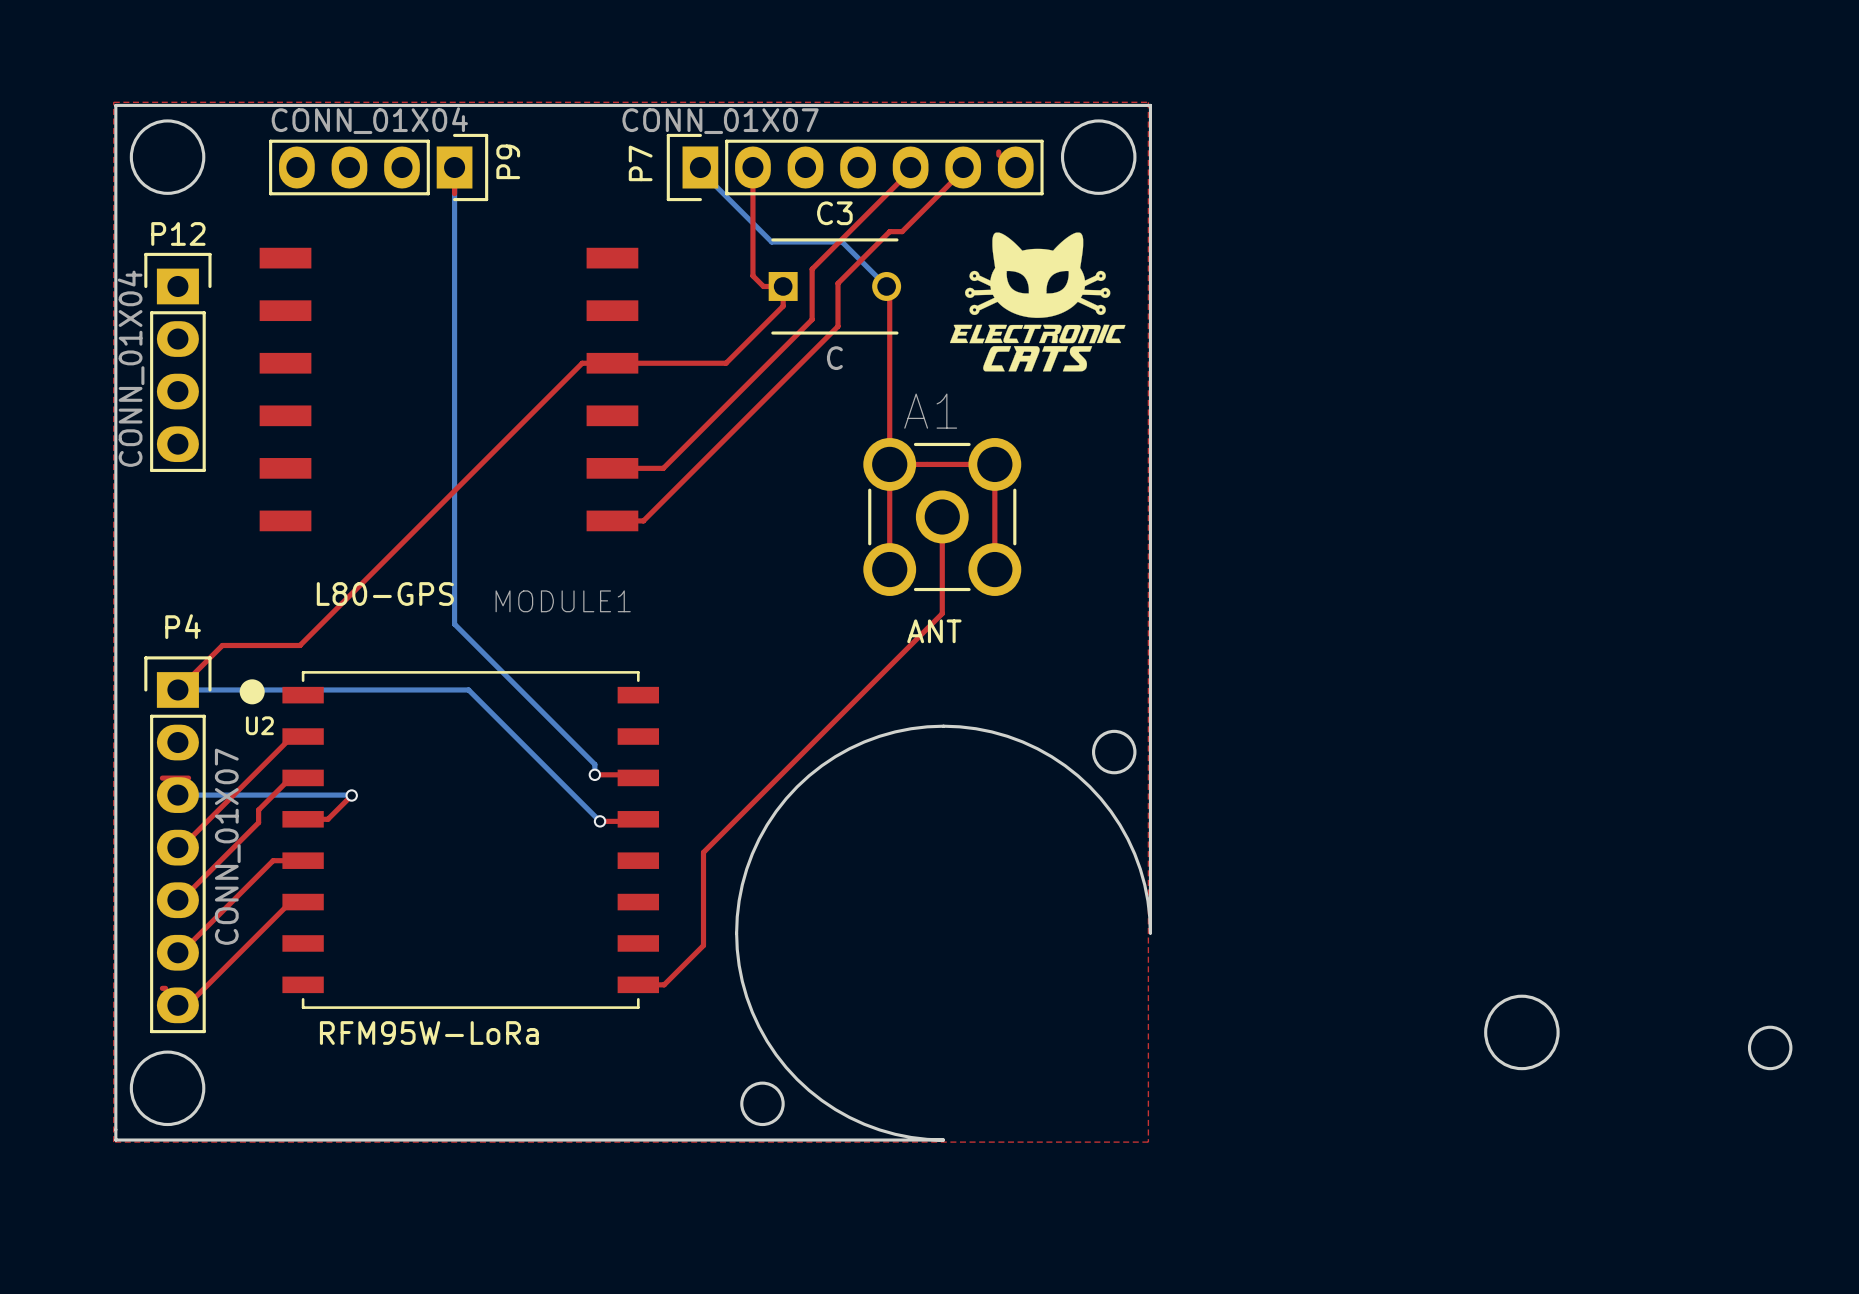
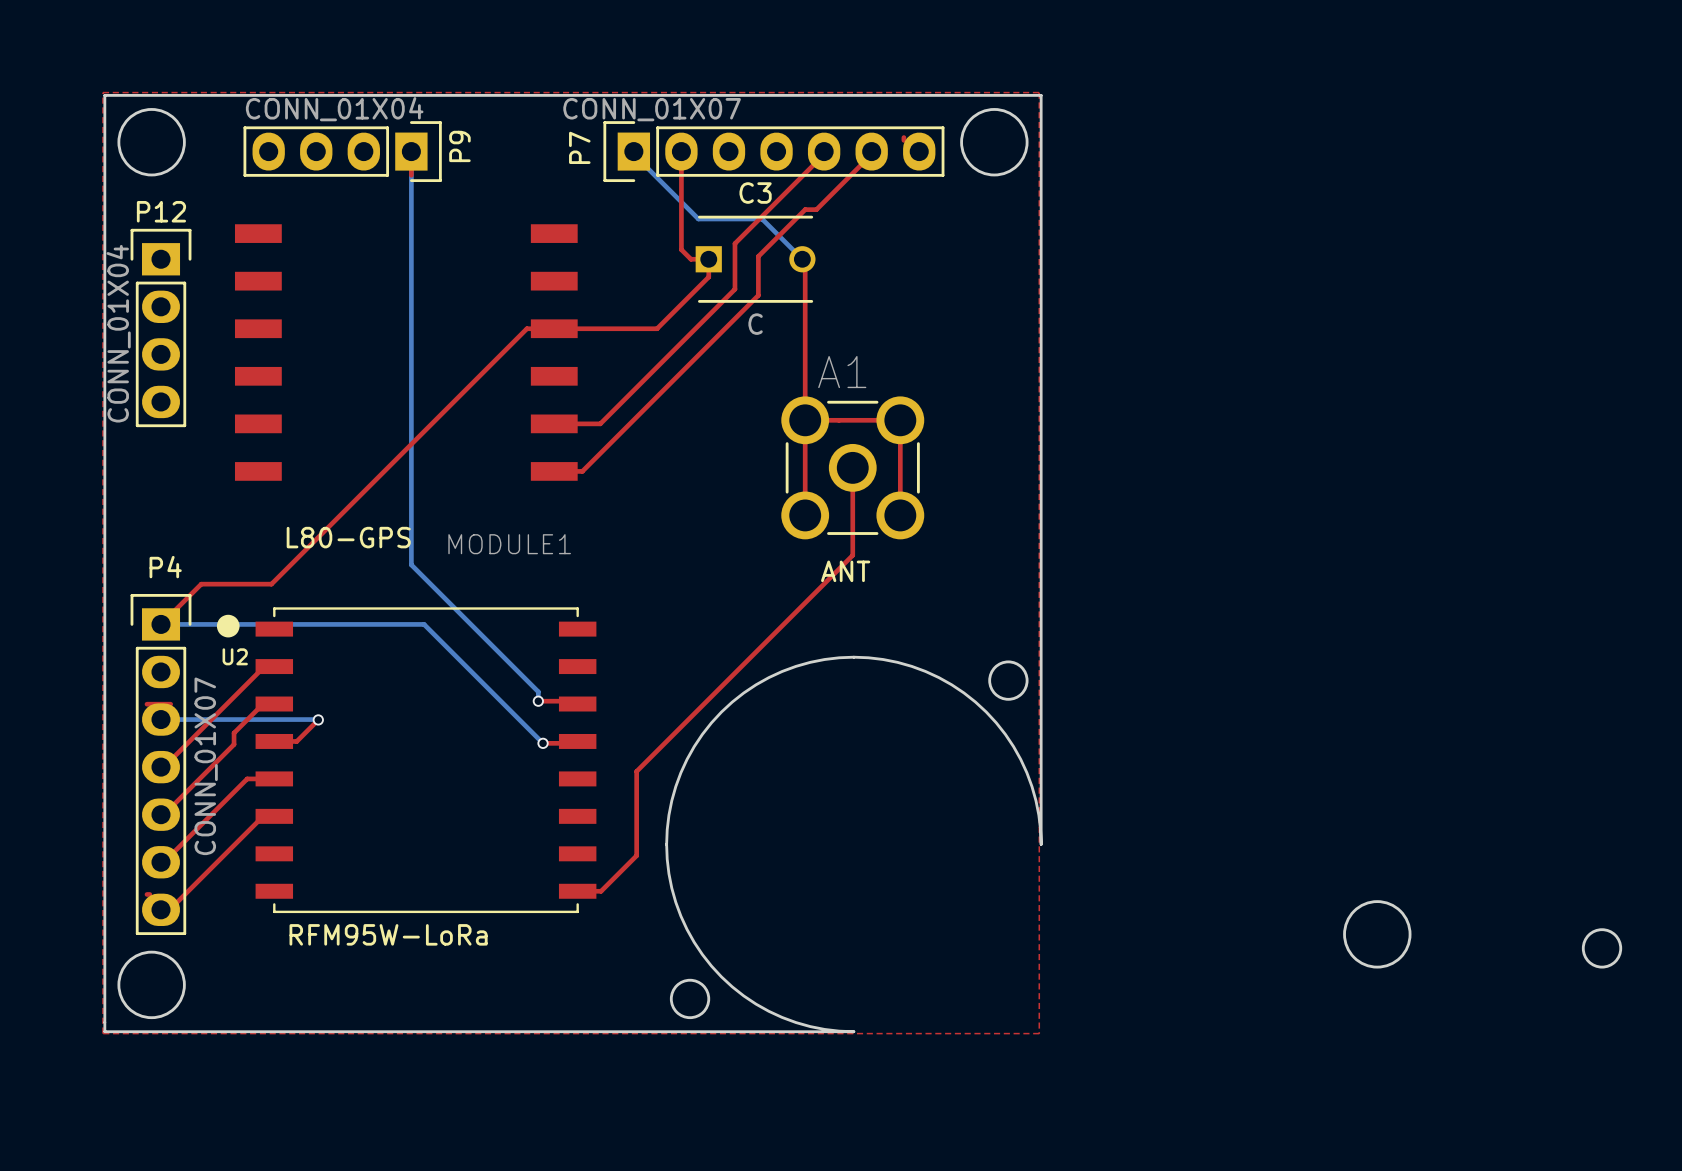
drawing: [949, 232, 1126, 372] -> none

